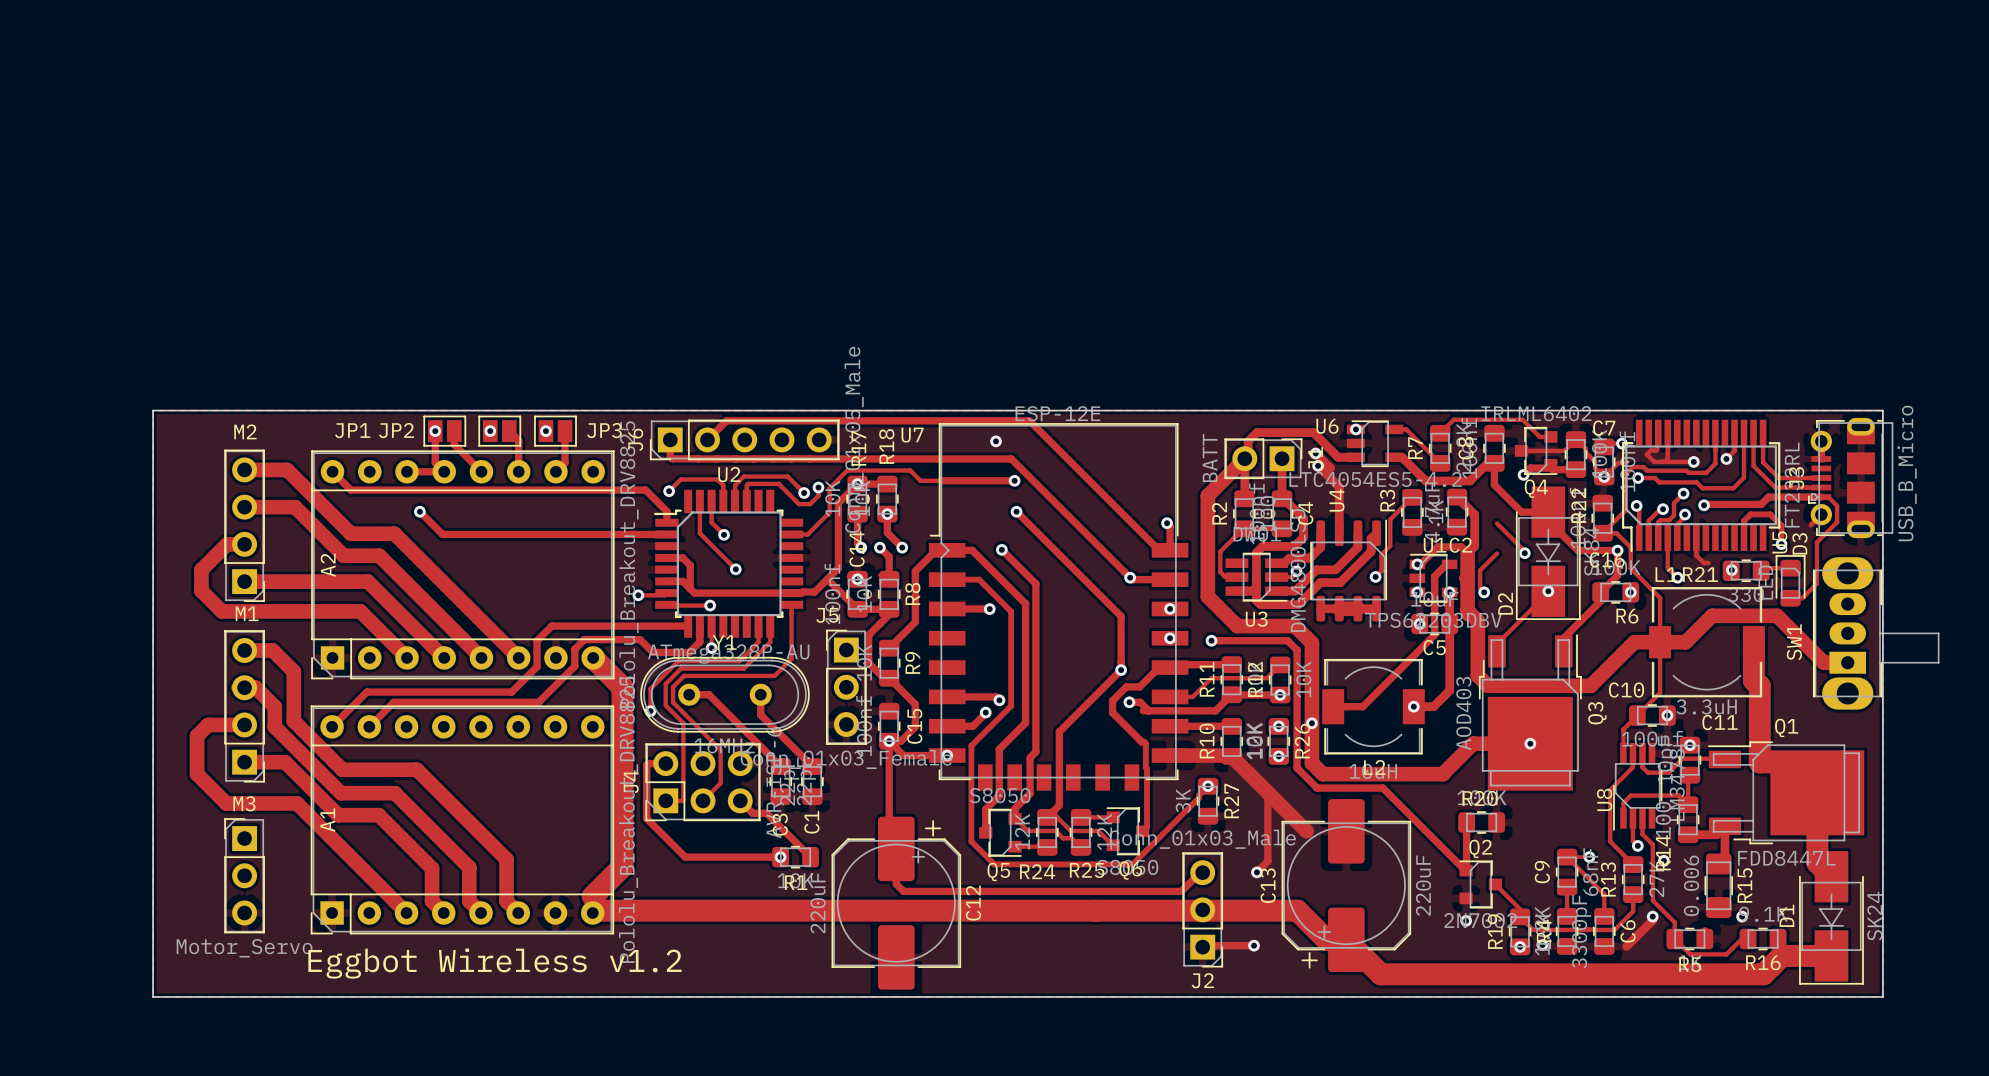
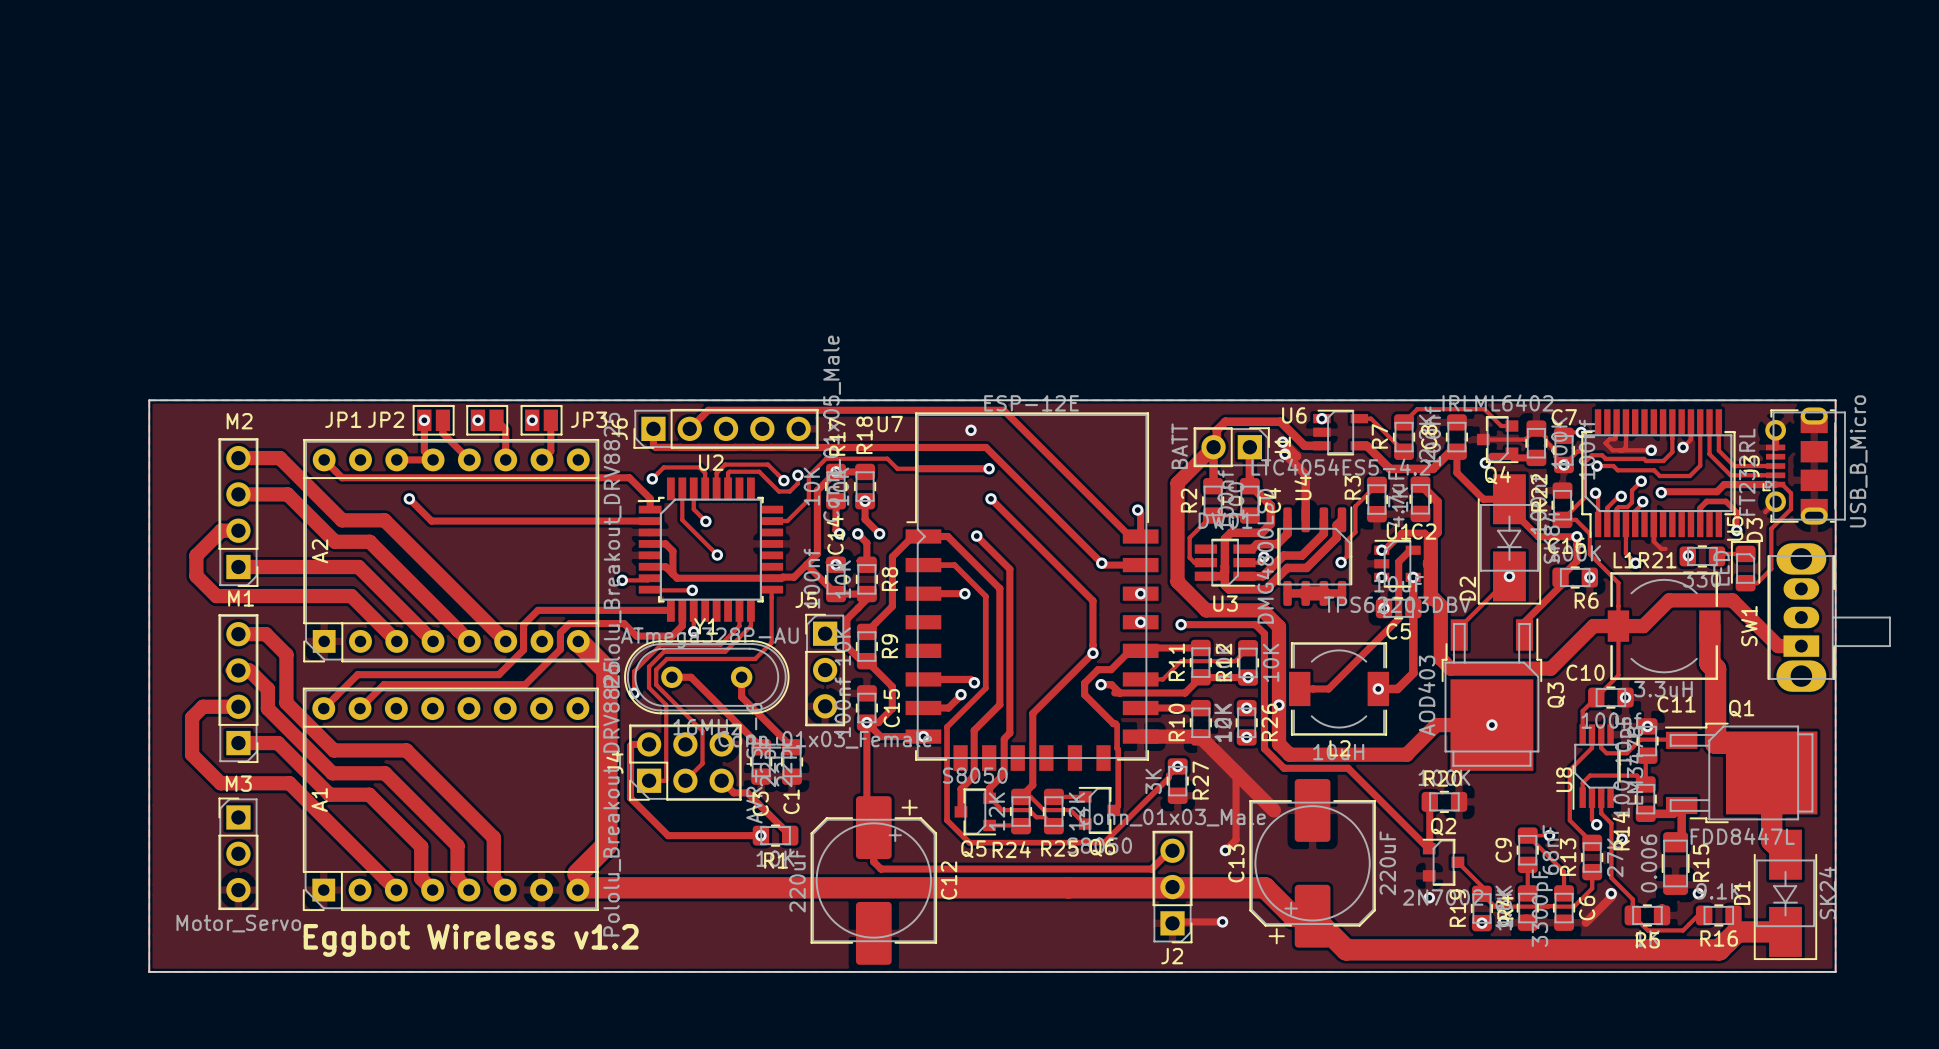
track: (1497, 523) (1524, 553) -> none
track: (1497, 553) (1480, 570) (1480, 588) (1484, 592) -> none
via: (1524, 553) -> none
via: (1484, 592) -> none

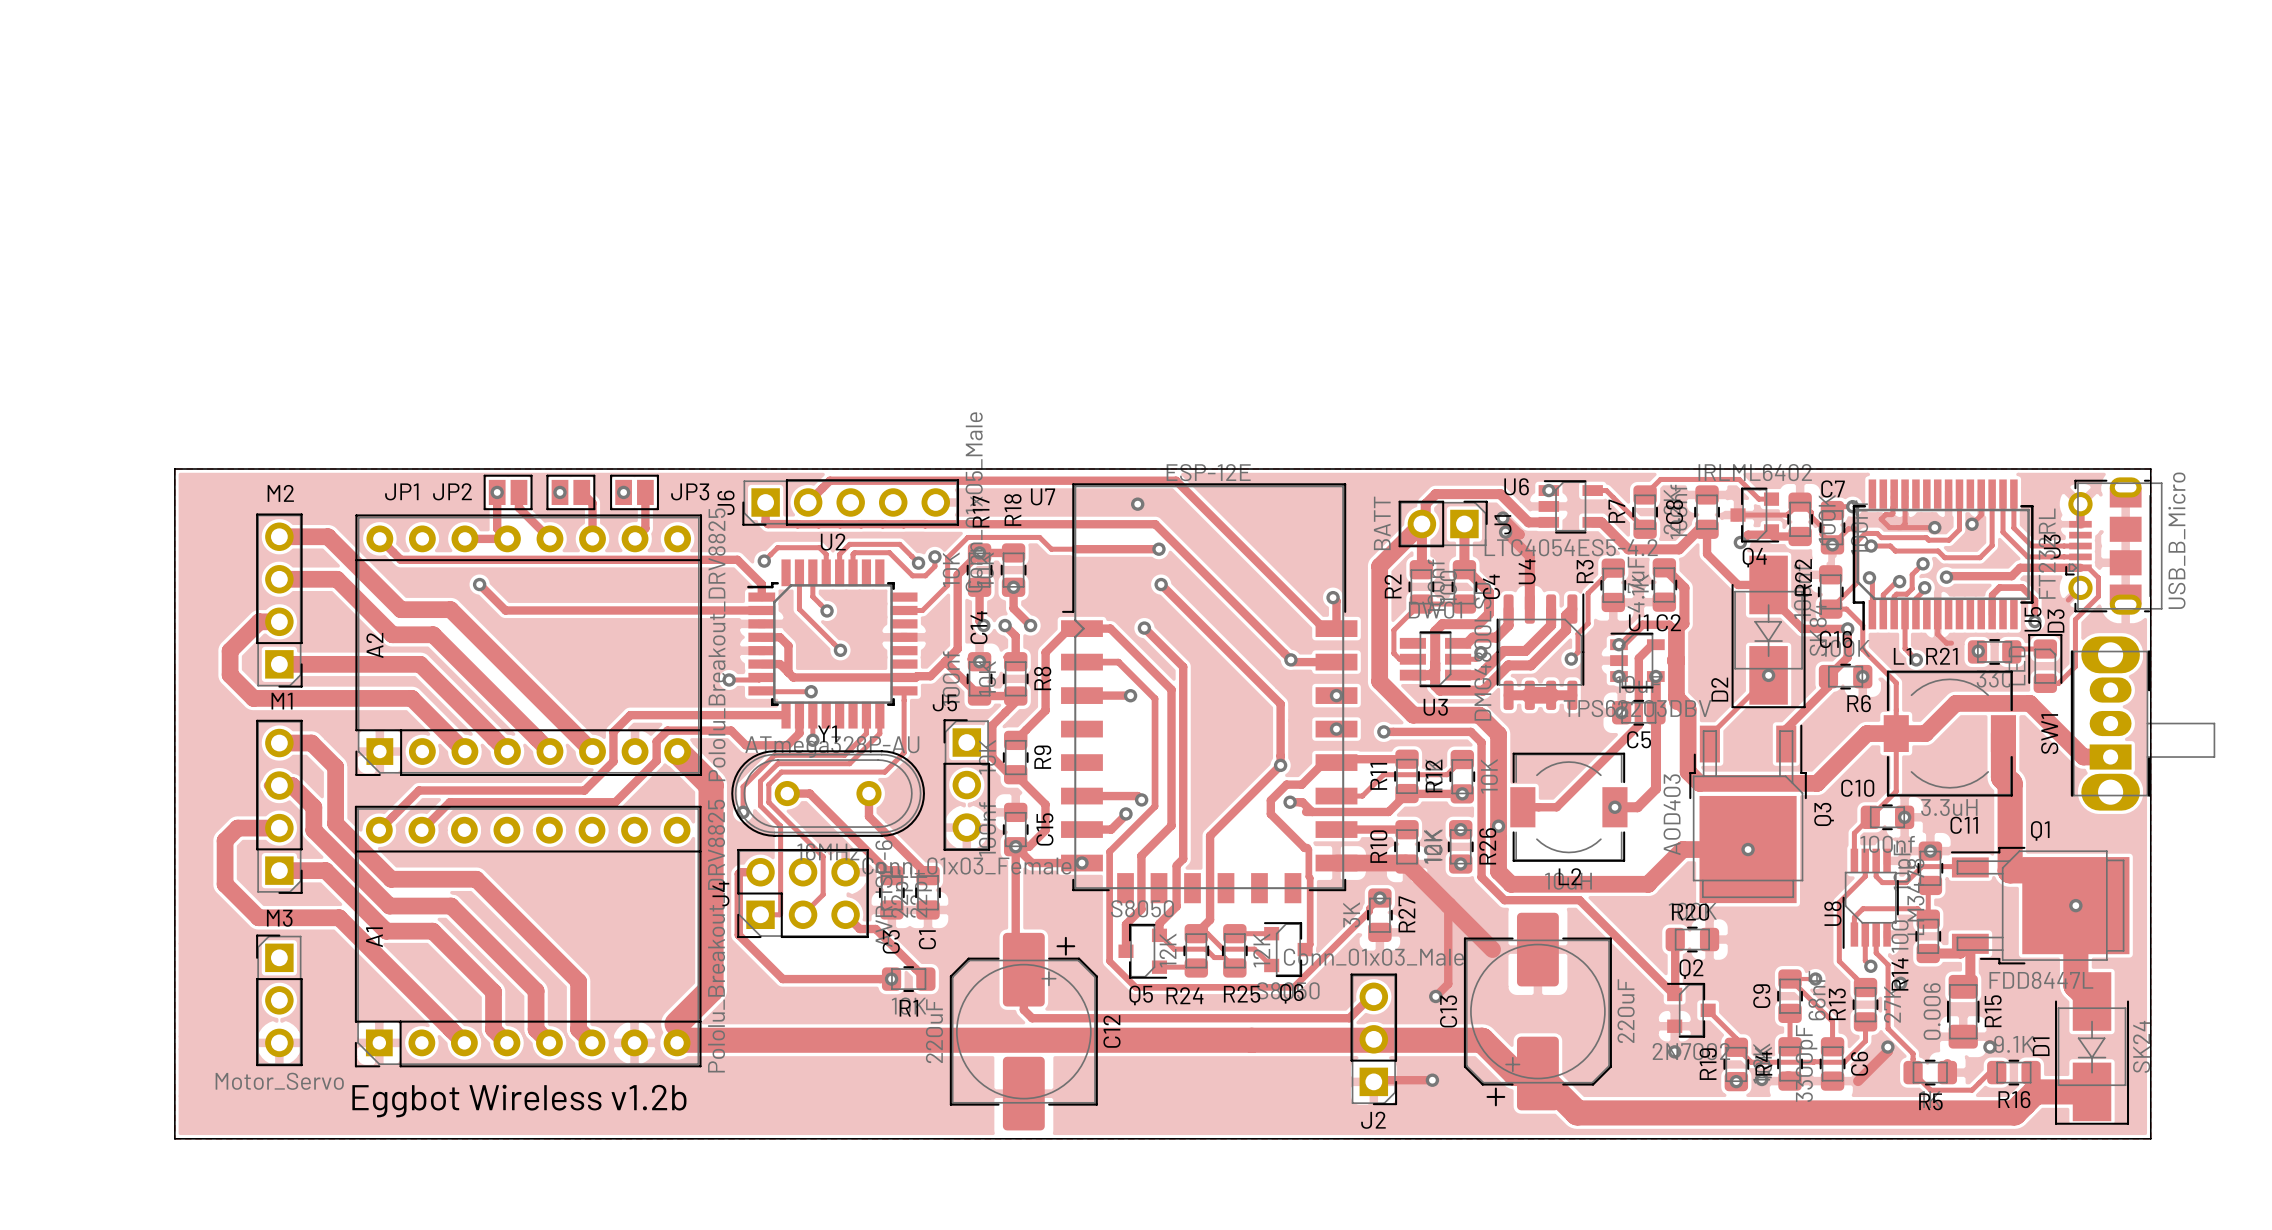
via: none -> (2075, 905)
text: Eggbot Wireless v1.2 (471, 940) -> Eggbot Wireless v1.2b (519, 1101)

